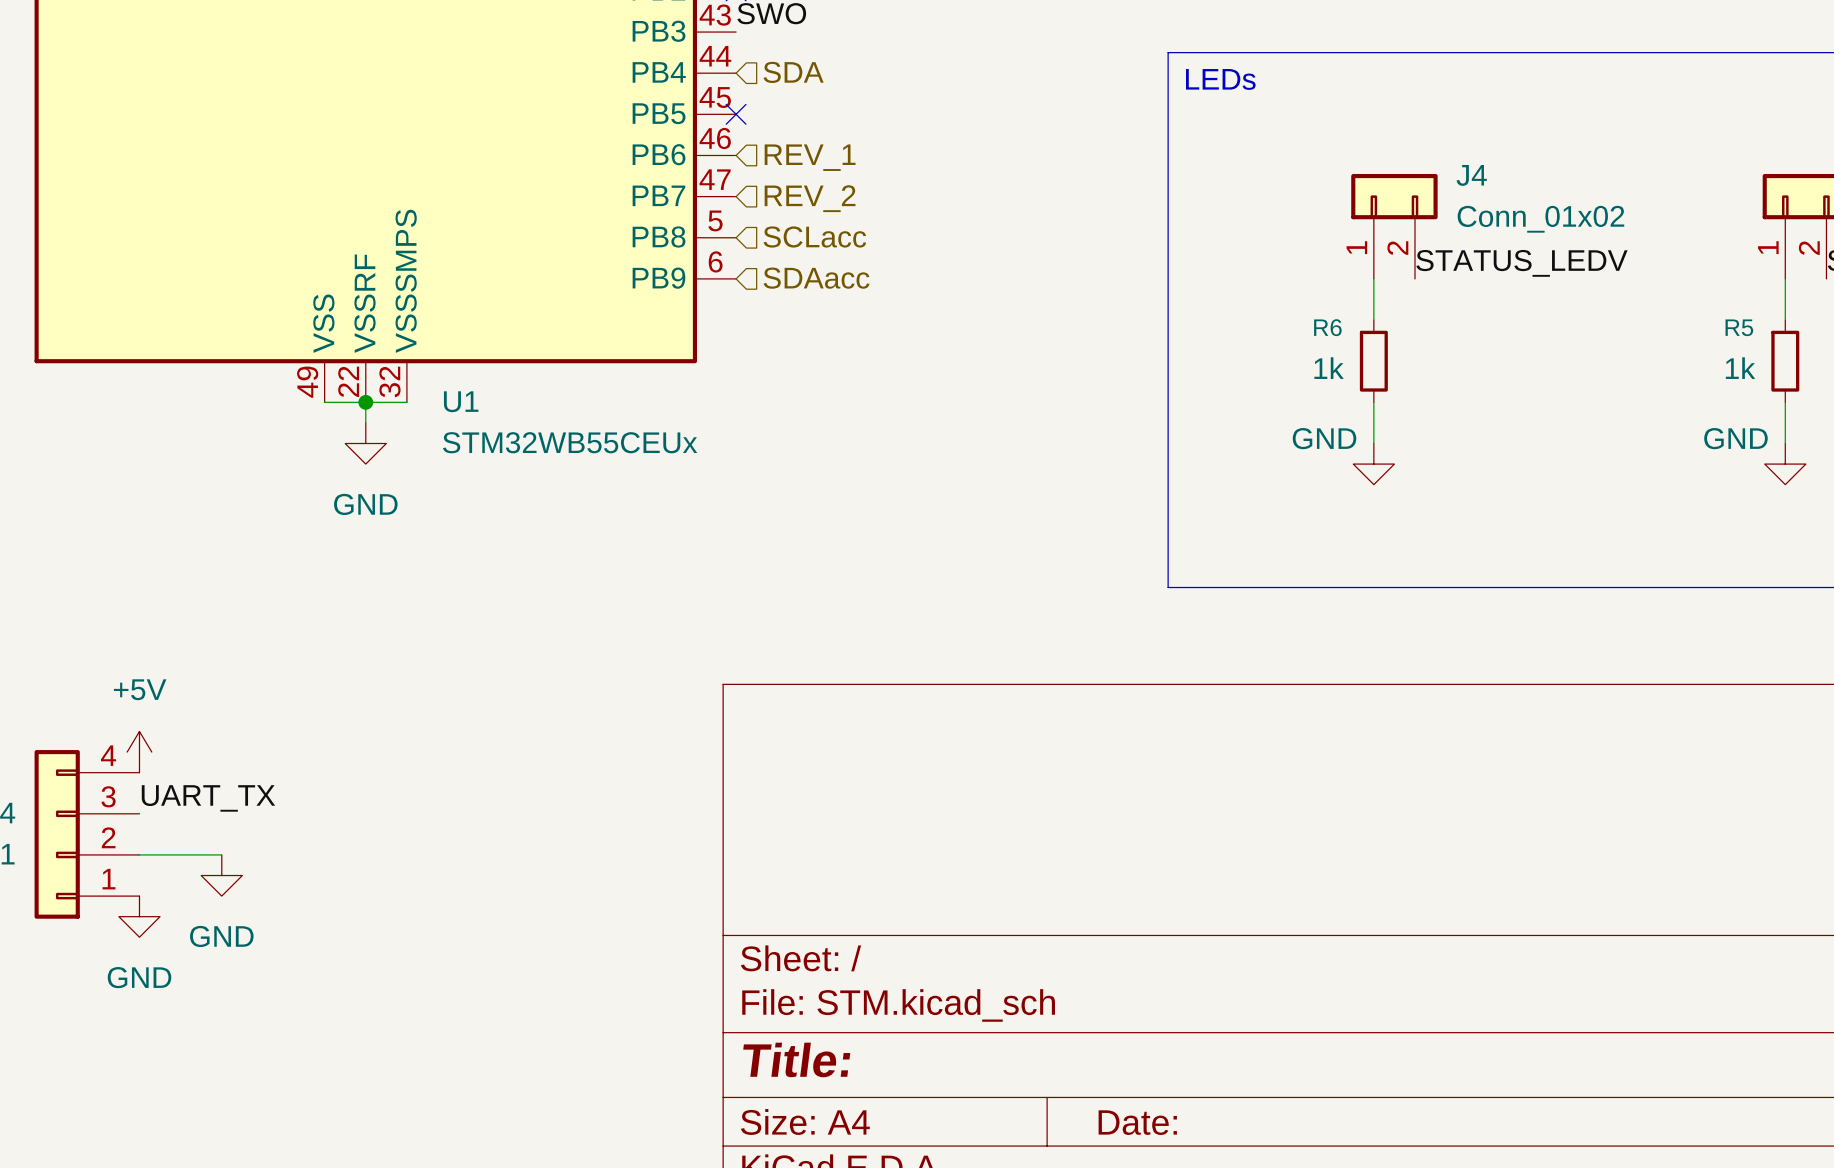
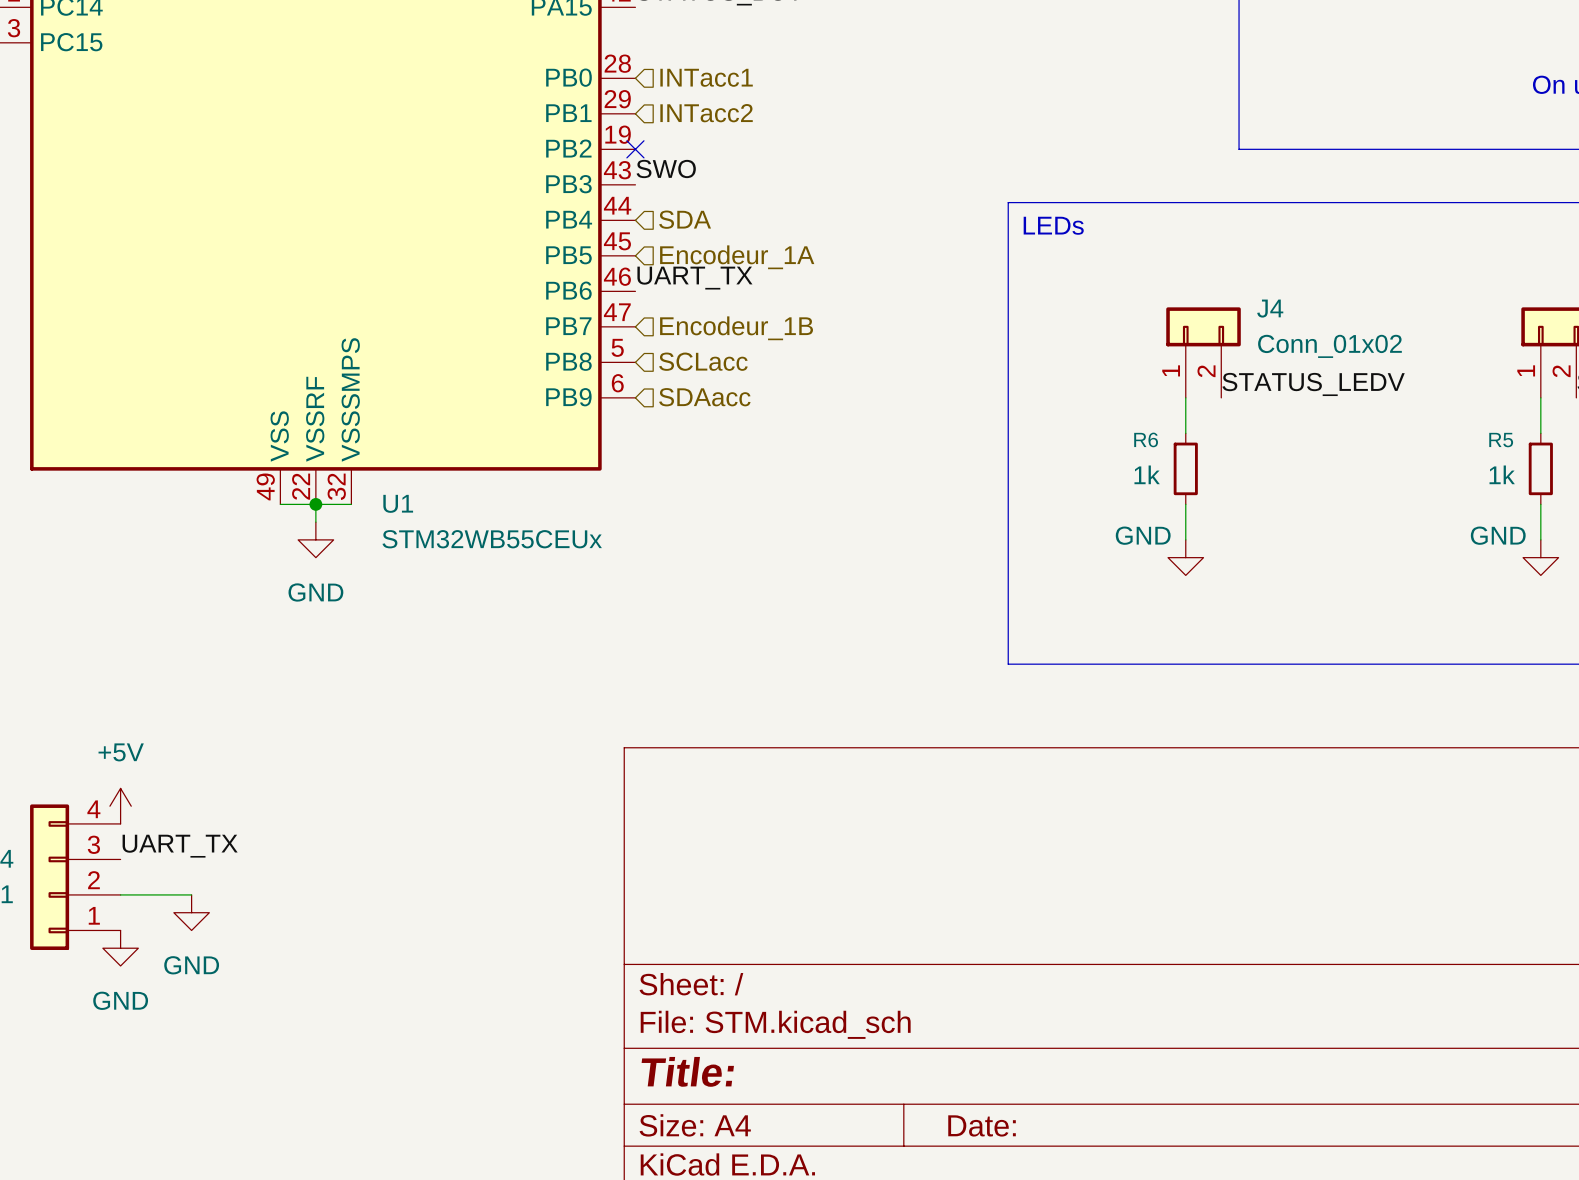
no-connect mark: (736, 114) -> none
hierarchical label: none -> Encodeur_1A (737, 257)
label: none -> UART_TX (694, 278)
hierarchical label: REV_1 (810, 157) -> none
hierarchical label: REV_2 (810, 198) -> Encodeur_1B (736, 328)

